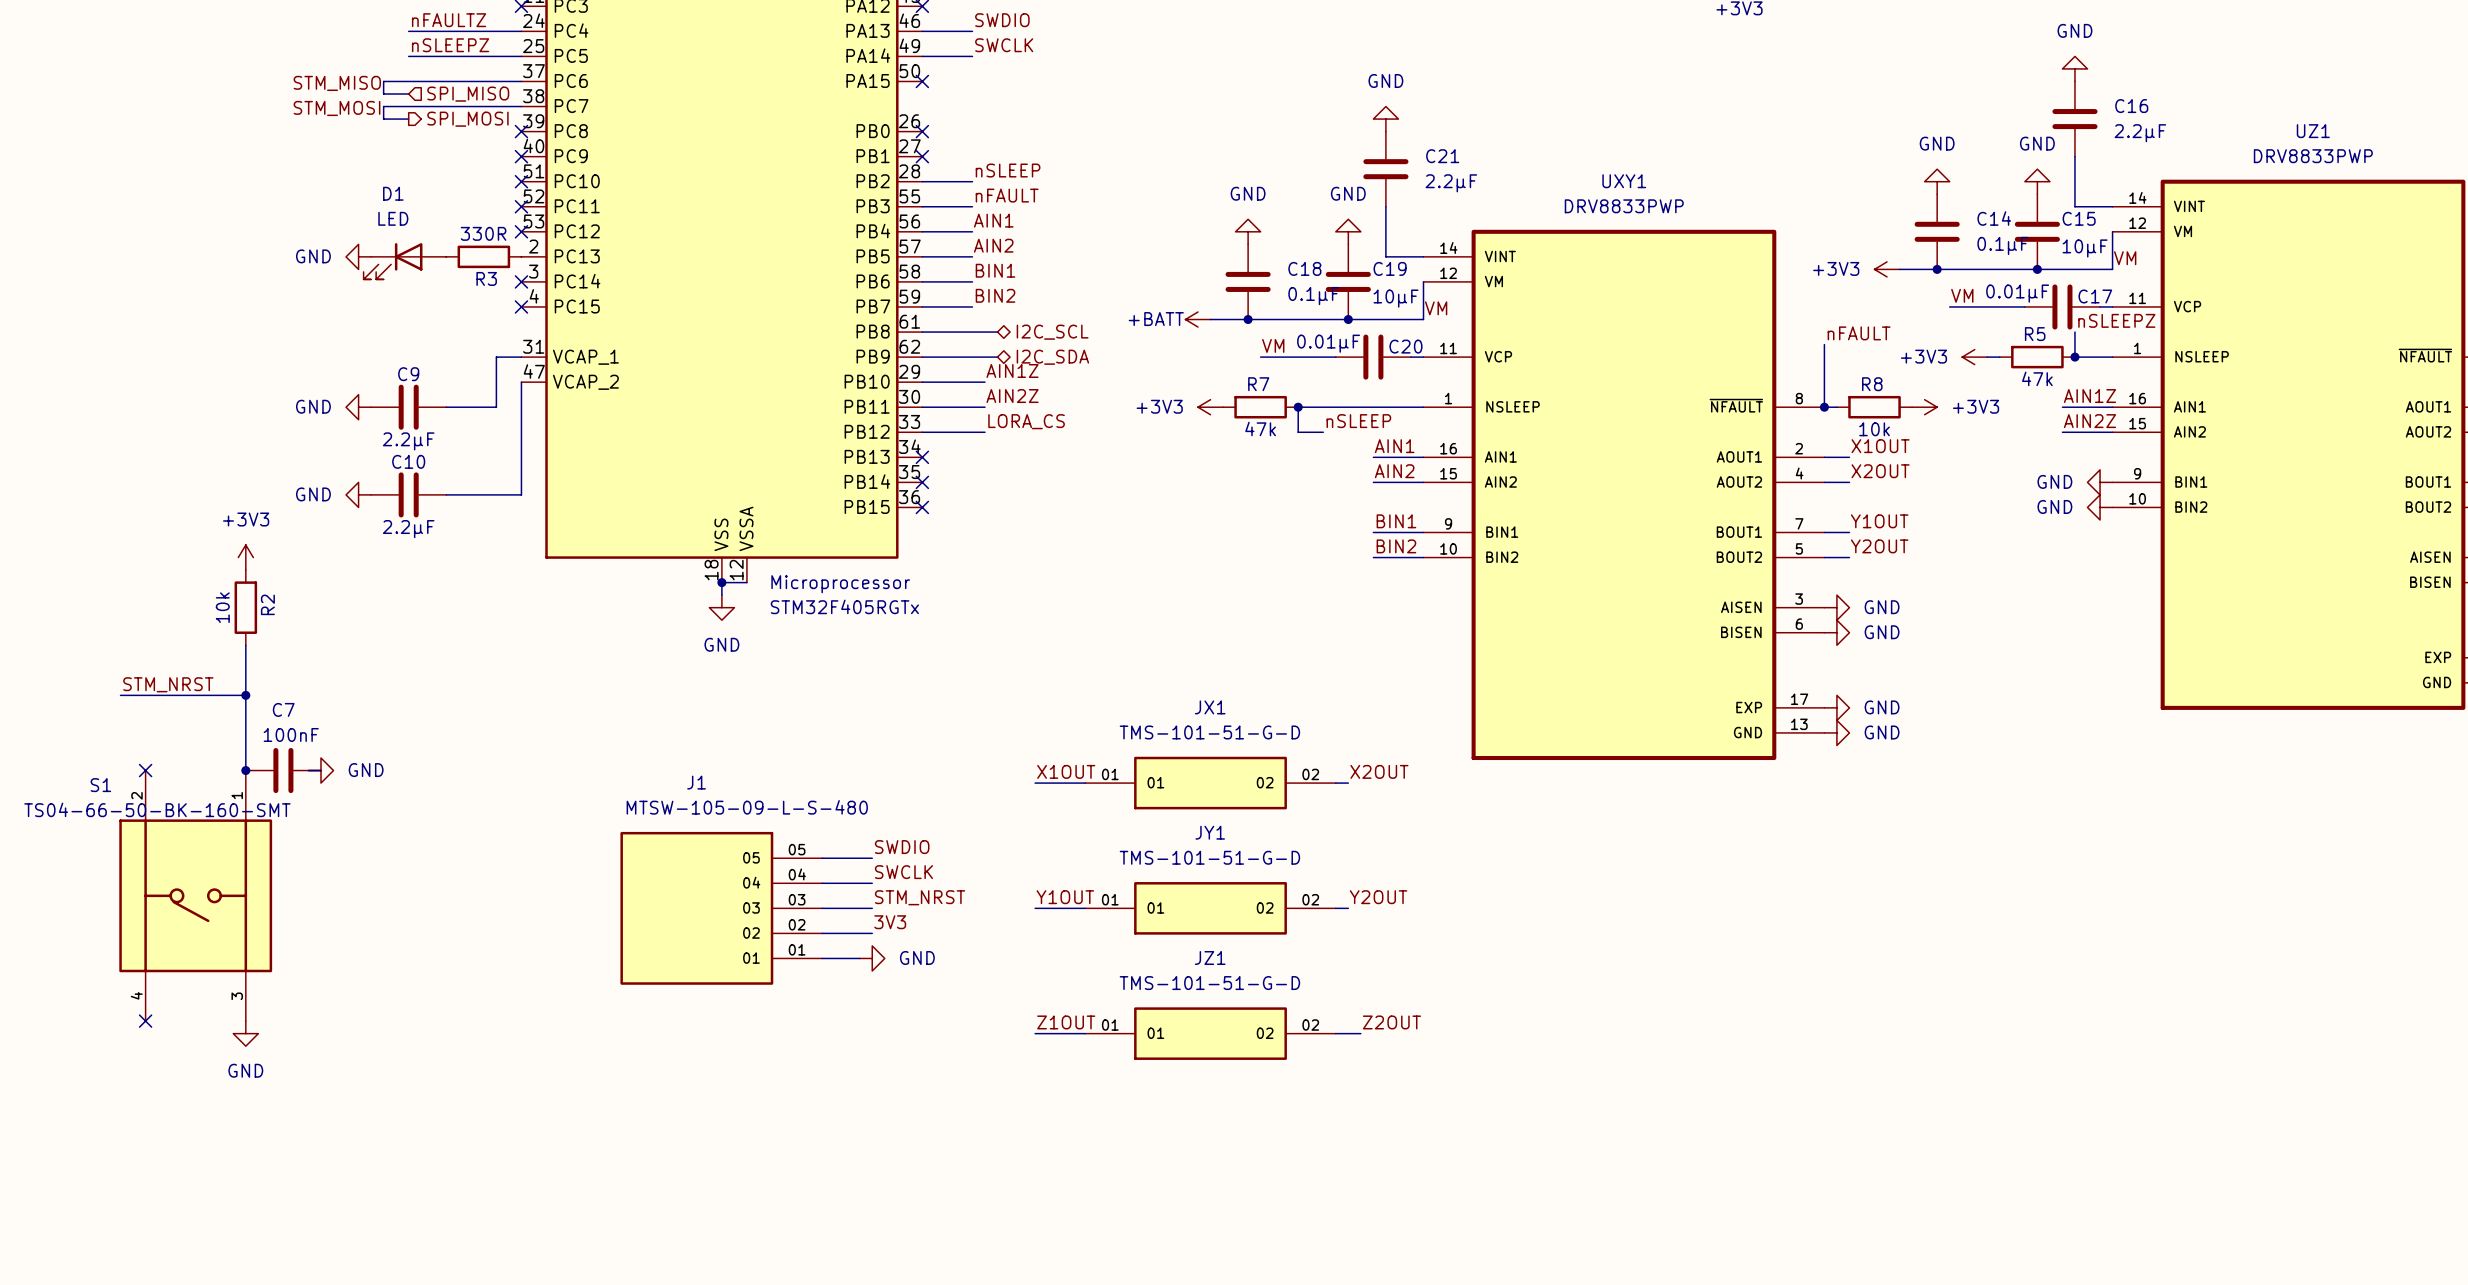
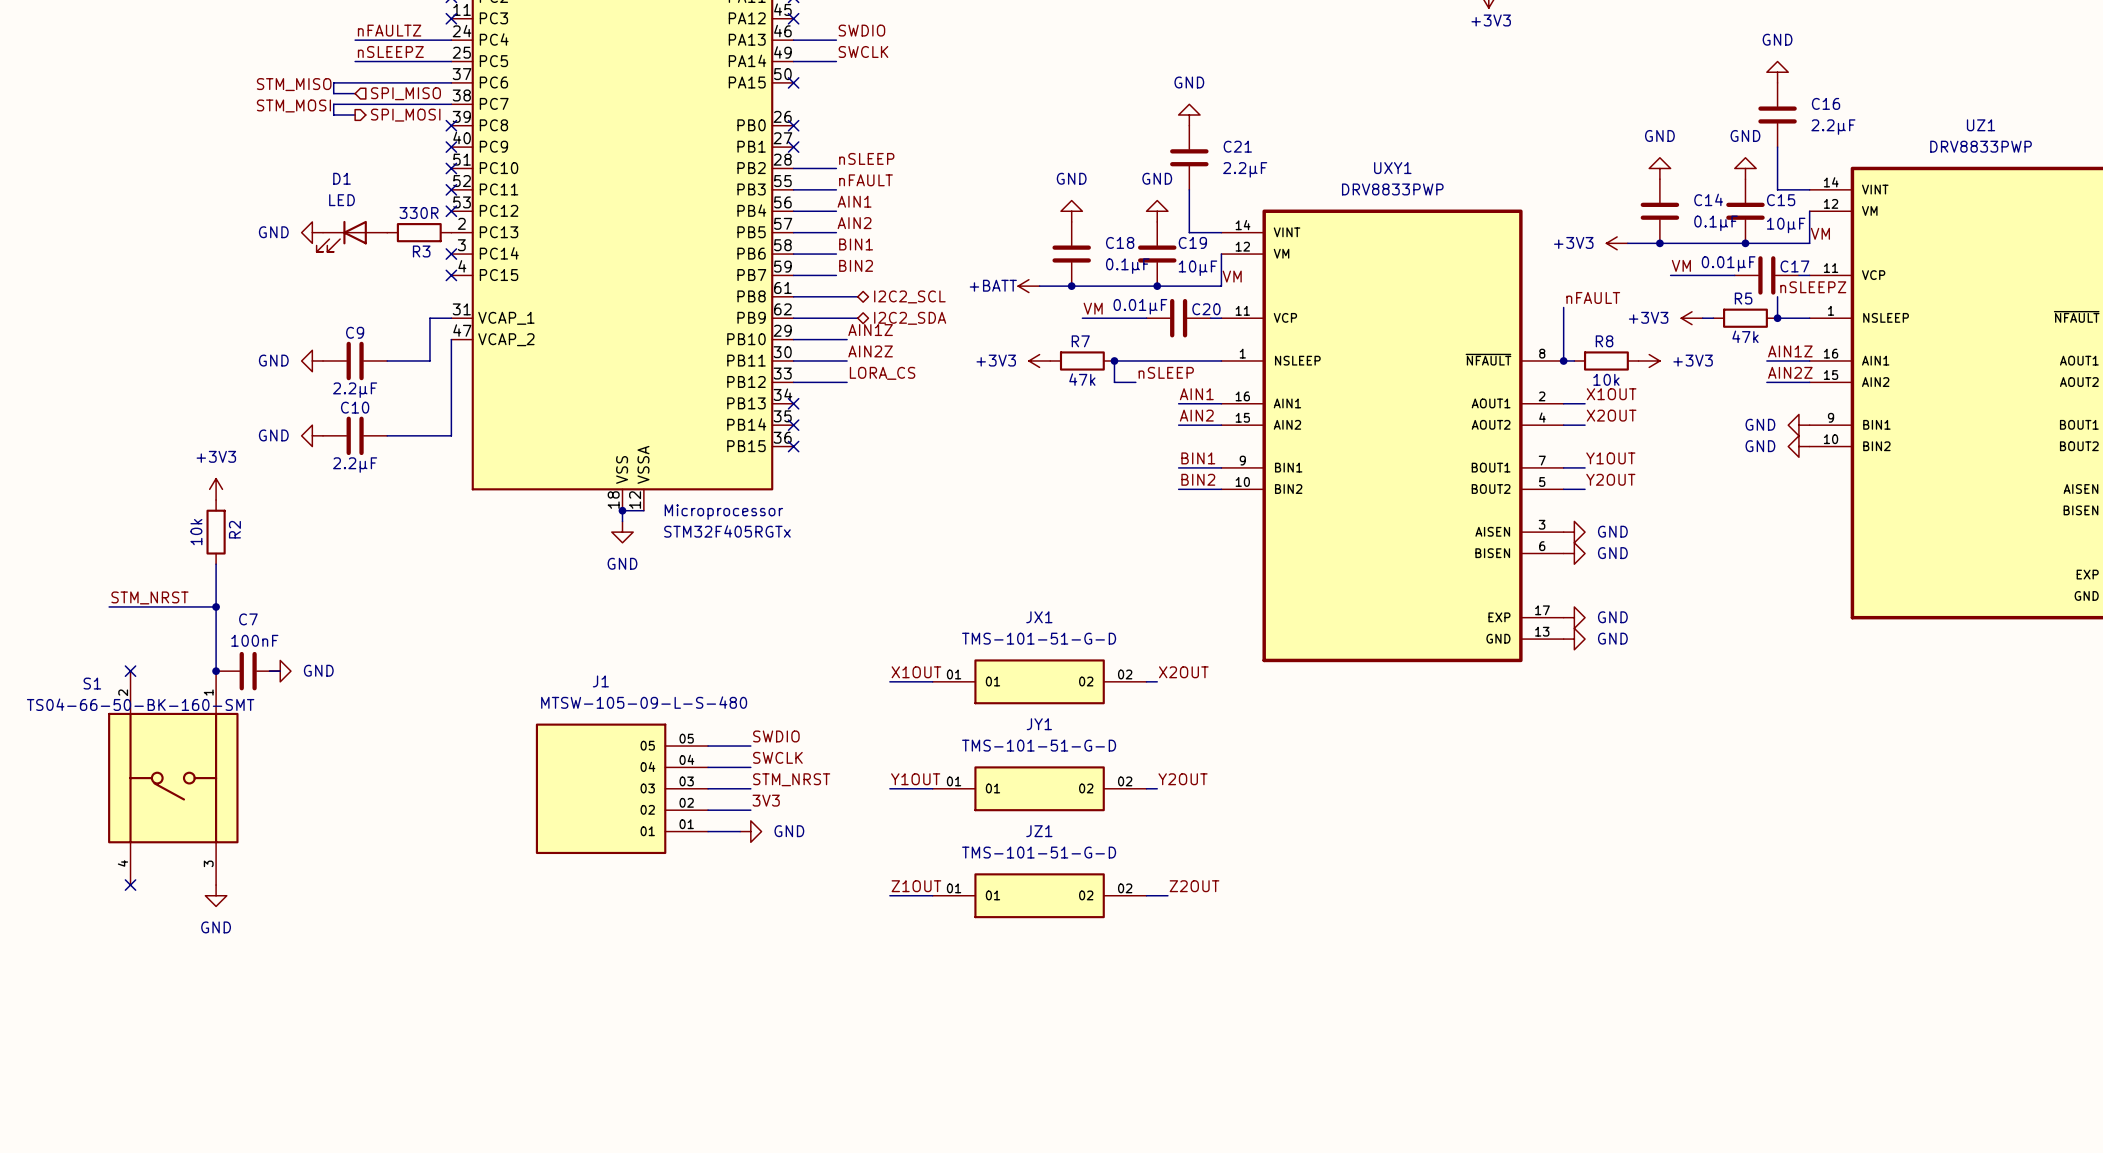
hierarchical label: I2C_SCL (1052, 332) -> I2C2_SCL (909, 296)
hierarchical label: I2C_SDA (1052, 357) -> I2C2_SDA (910, 318)

